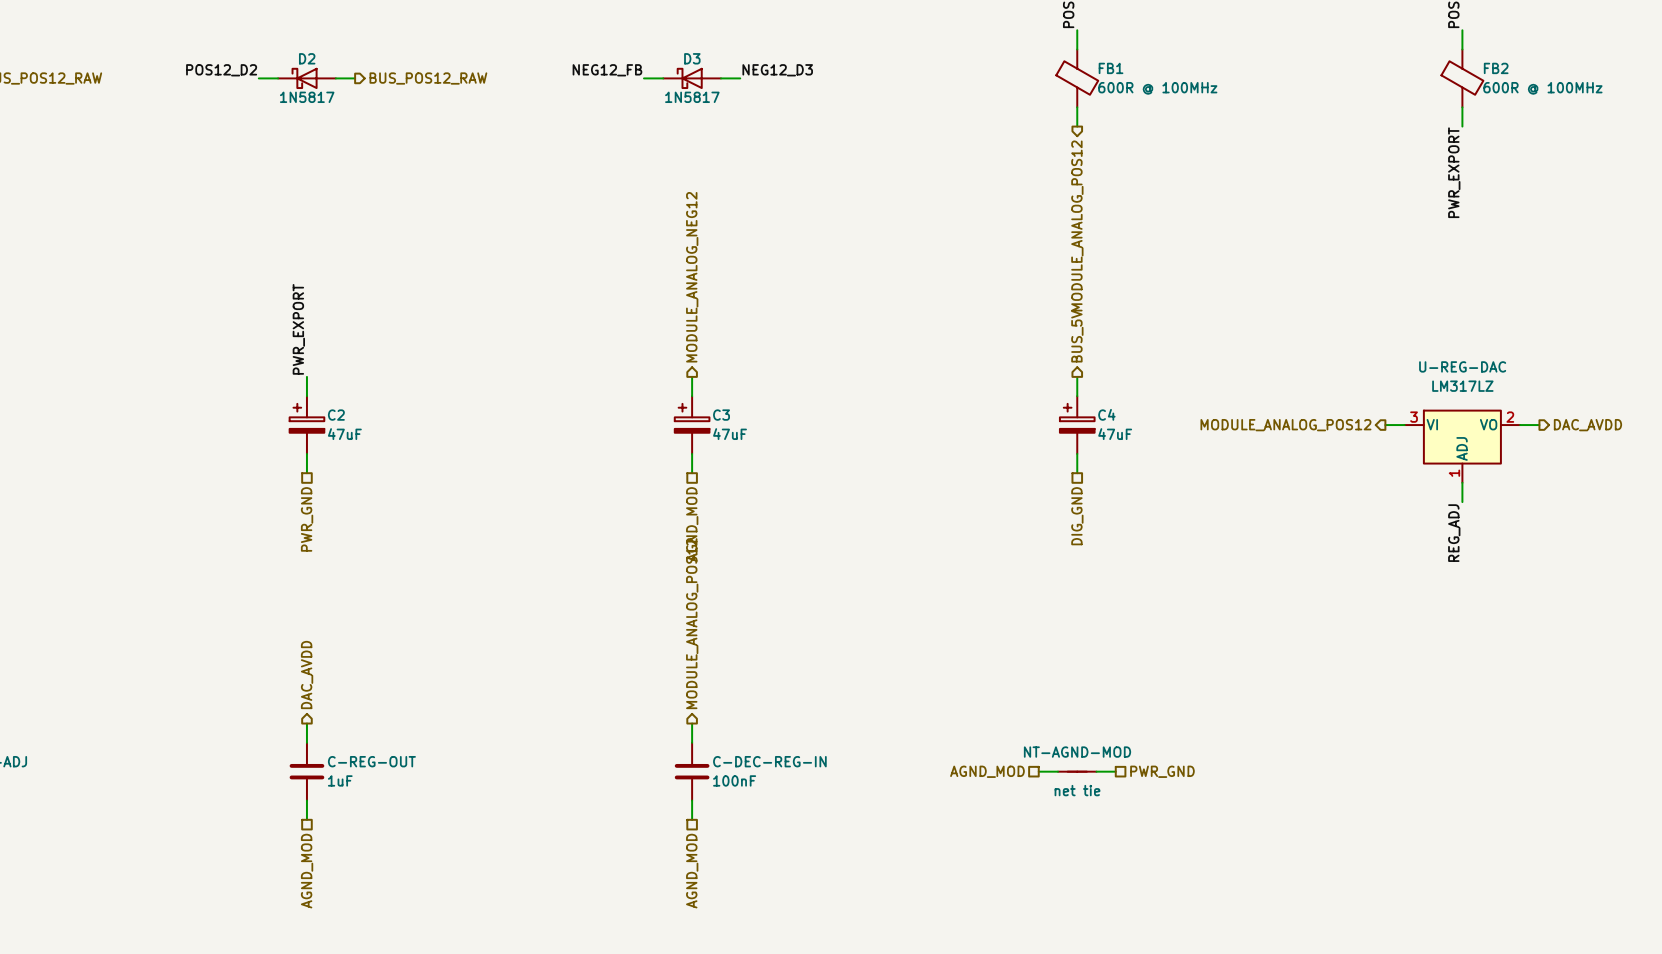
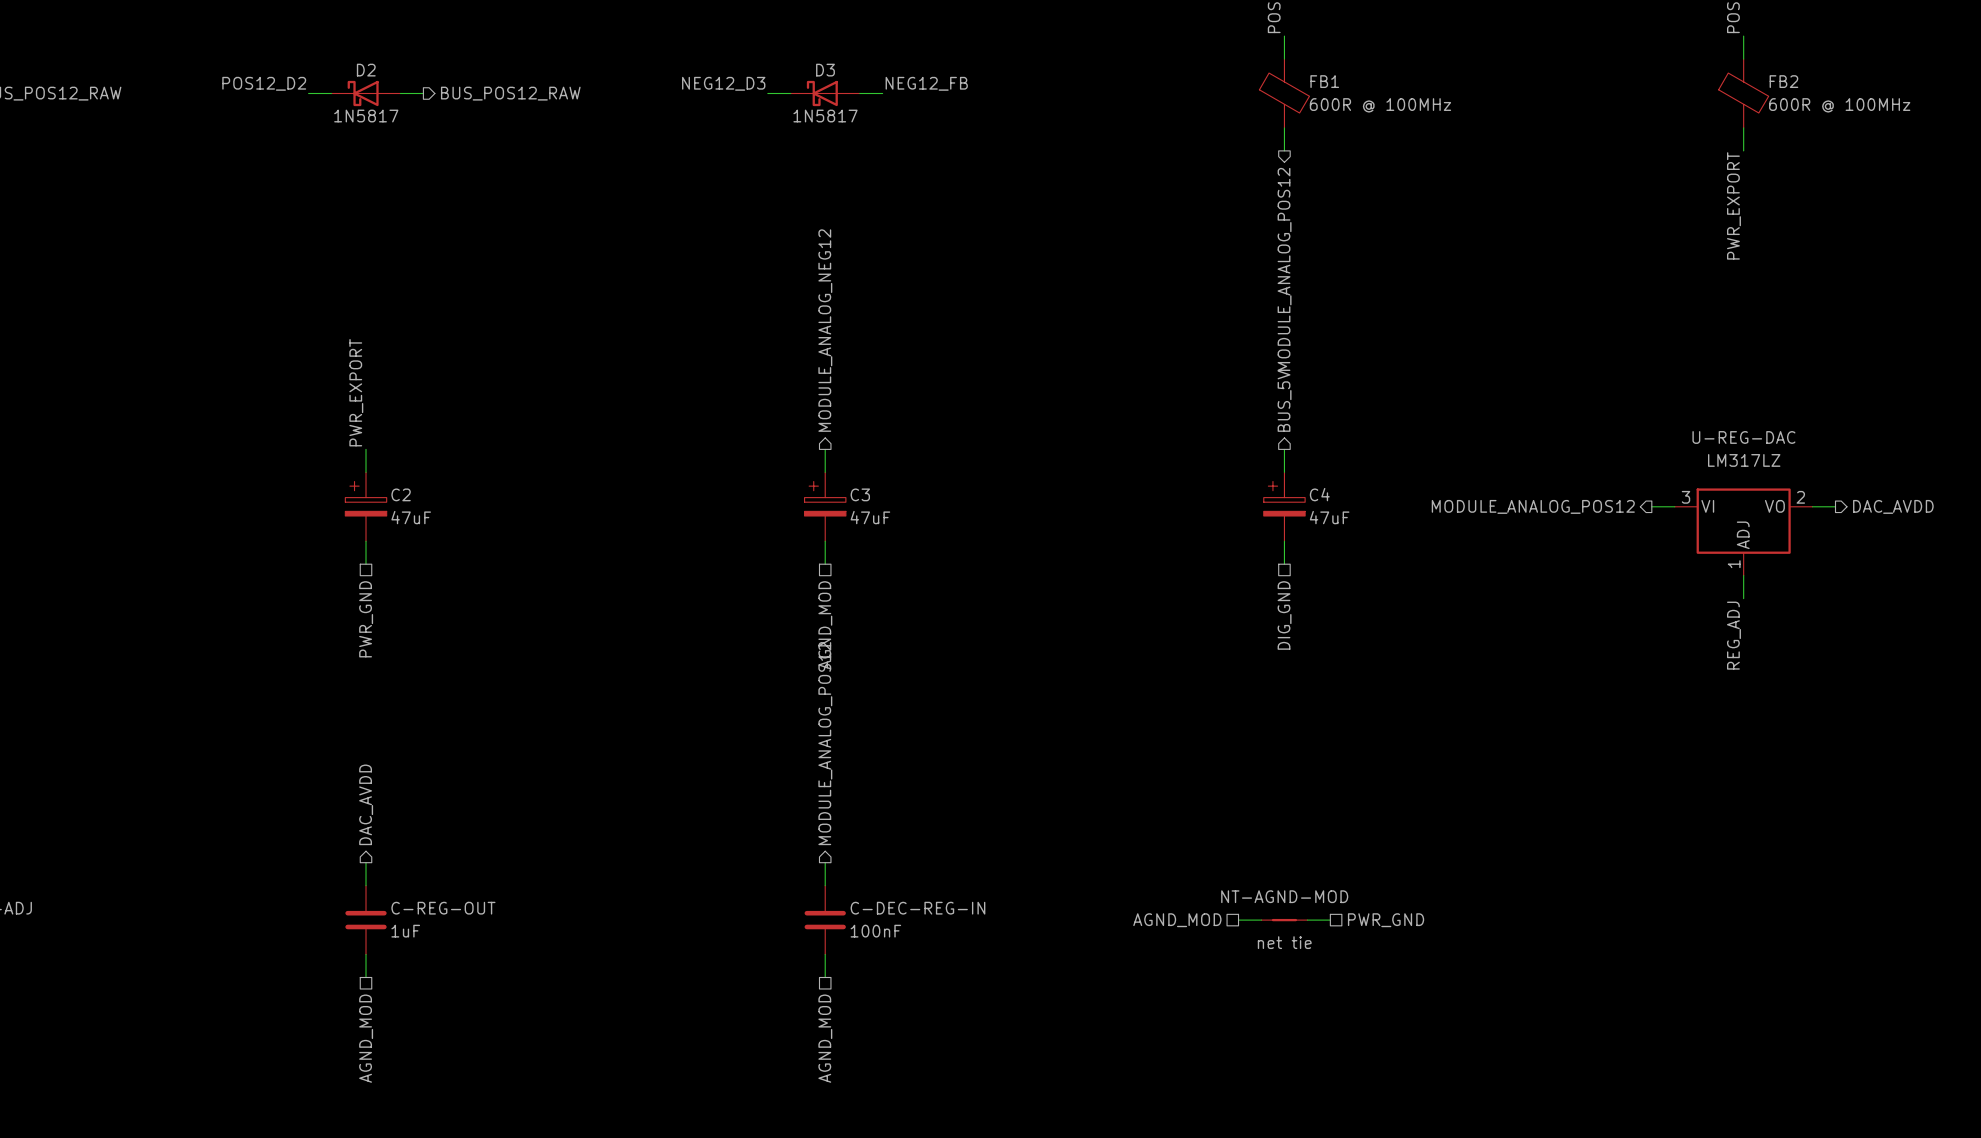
label: NEG12_FB (607, 70) -> NEG12_D3 (723, 83)
label: NEG12_D3 (777, 70) -> NEG12_FB (926, 83)

